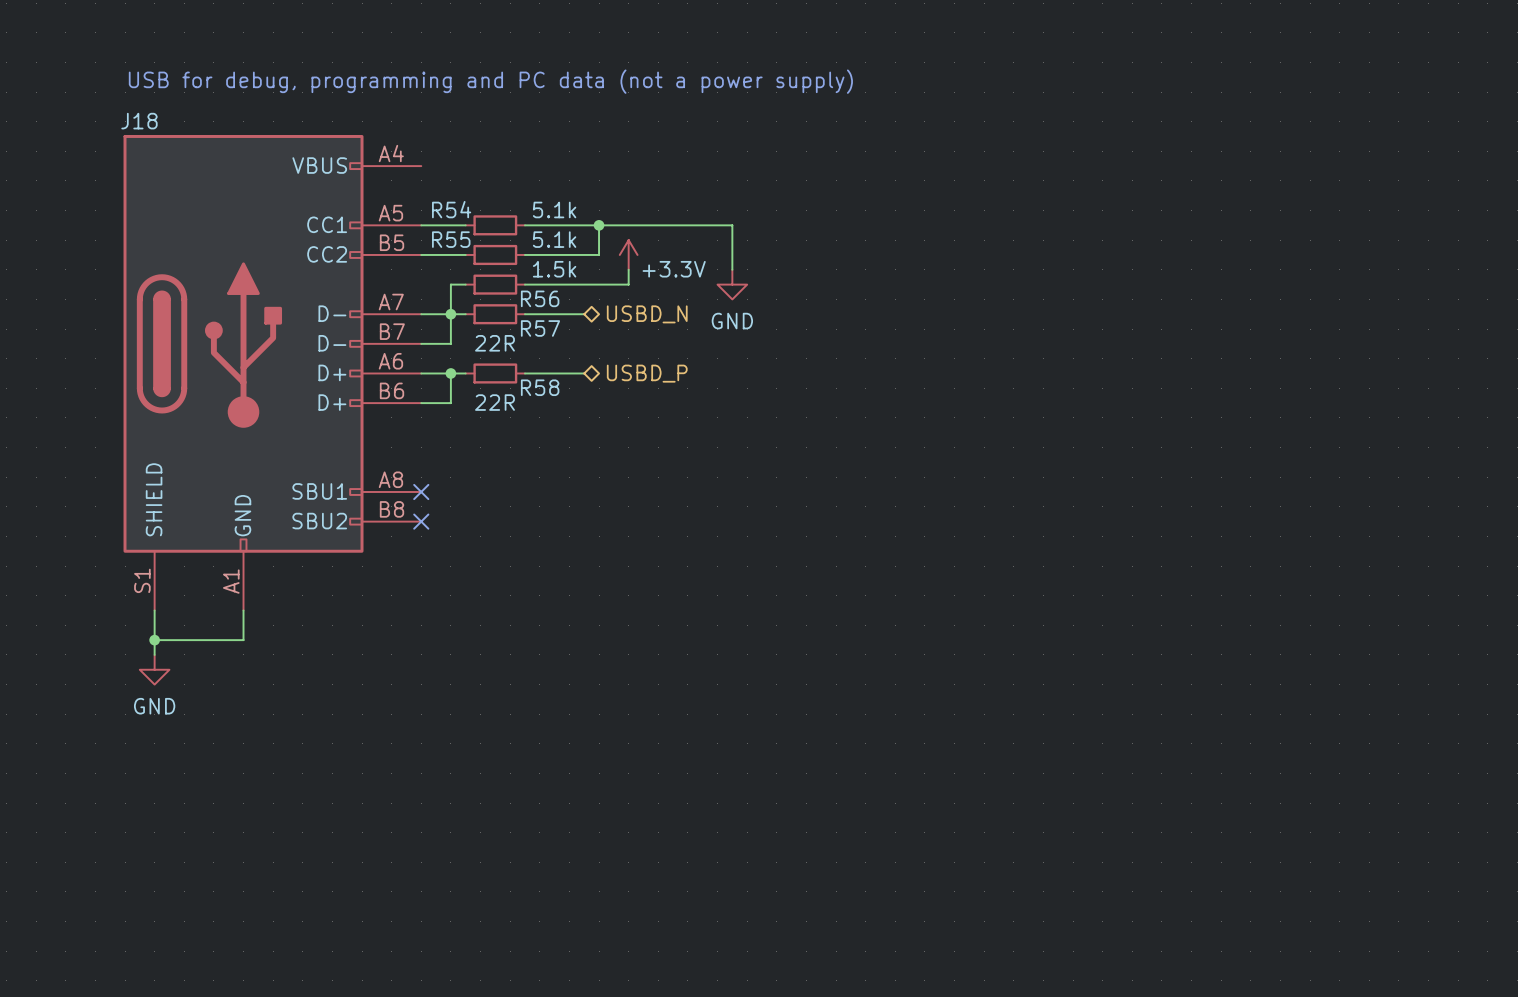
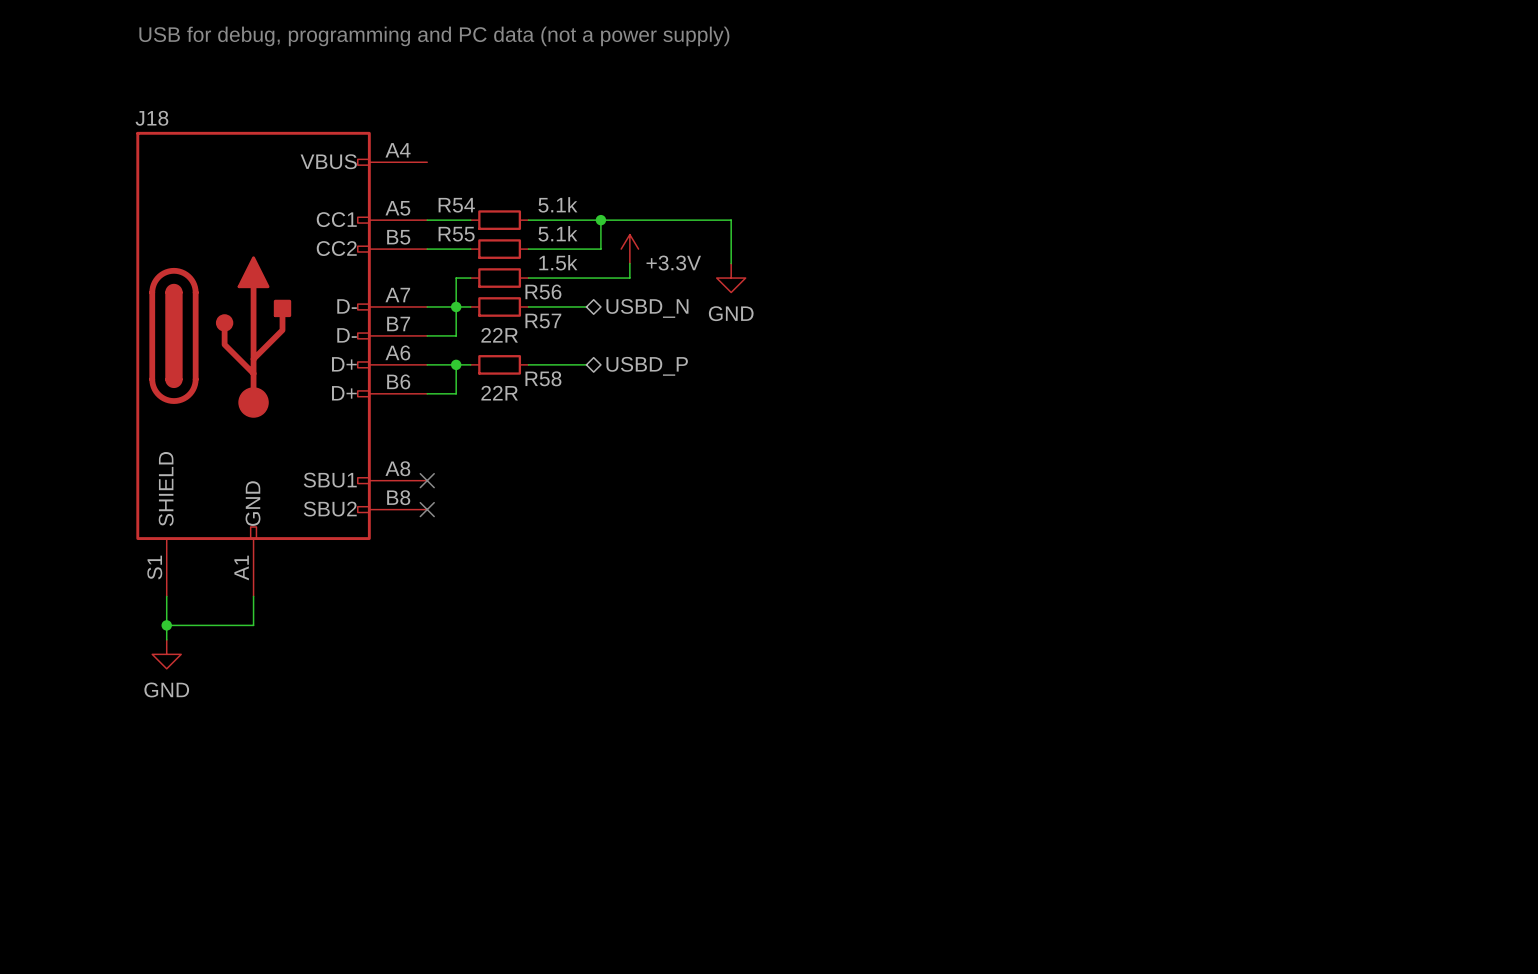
text position: USB for debug, programming and PC data (not a power supply) (490, 81) -> USB for debug, programming and PC data (not a power supply) (434, 36)

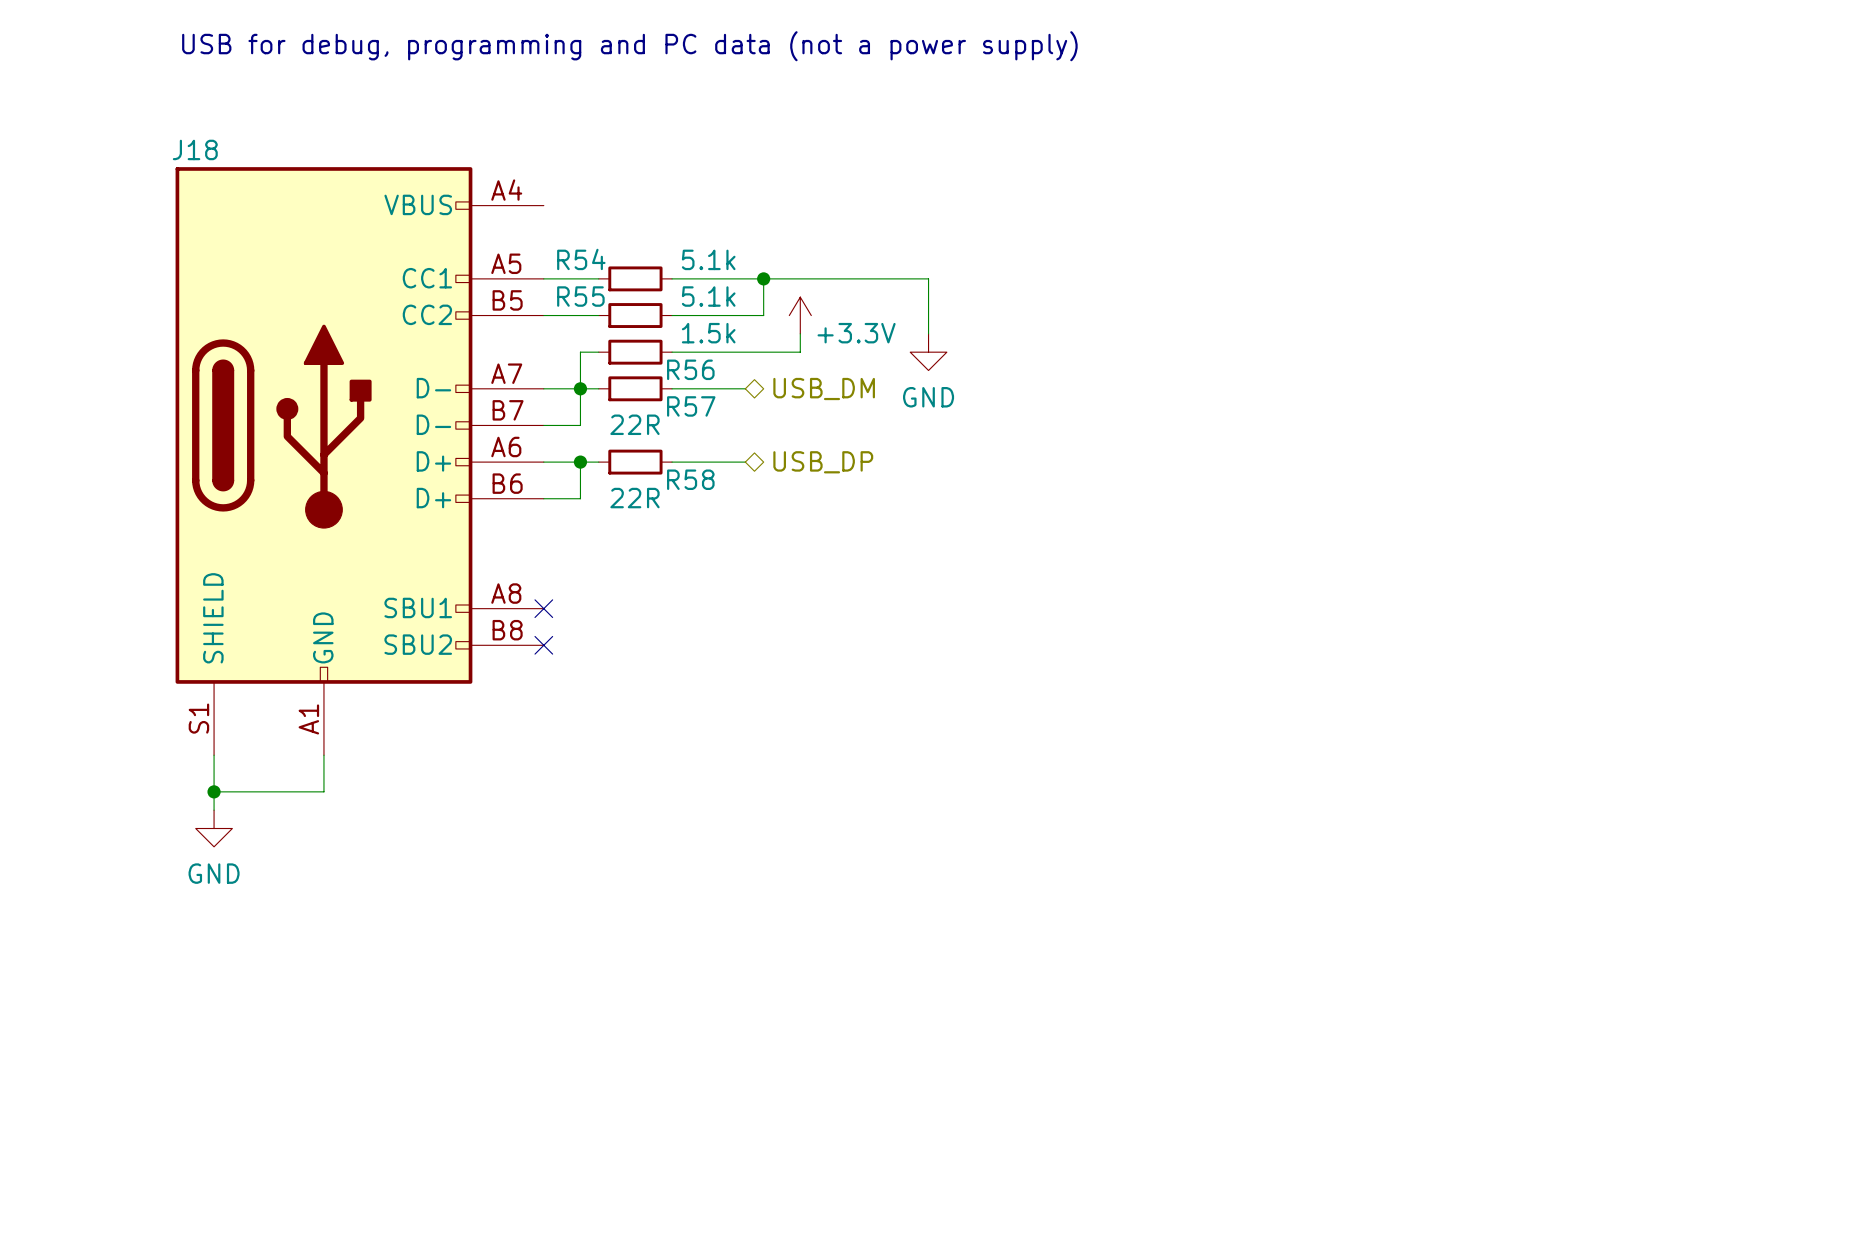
hierarchical label: USBD_N (647, 308) -> USB_DM (824, 389)
hierarchical label: USBD_P (647, 366) -> USB_DP (823, 462)

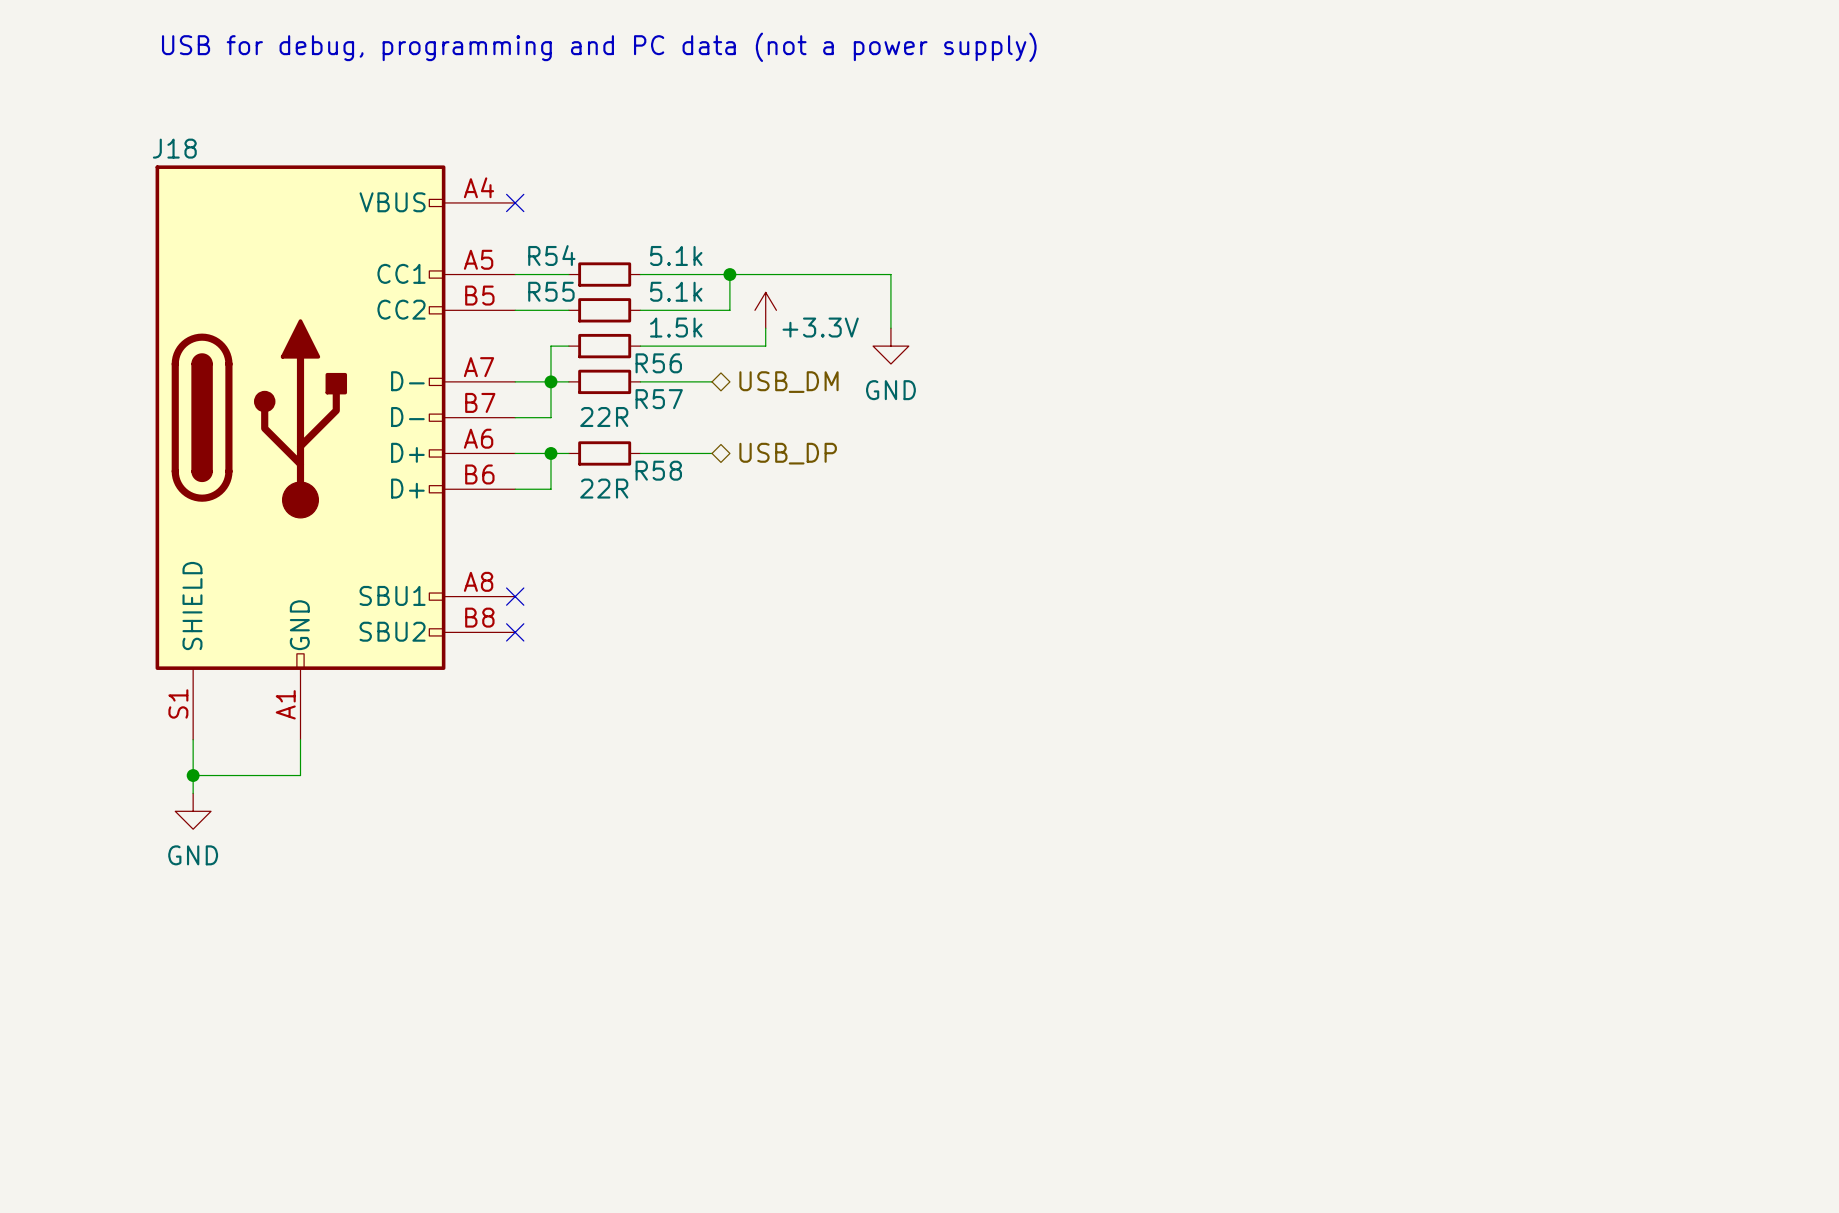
no-connect mark: none -> (515, 202)

